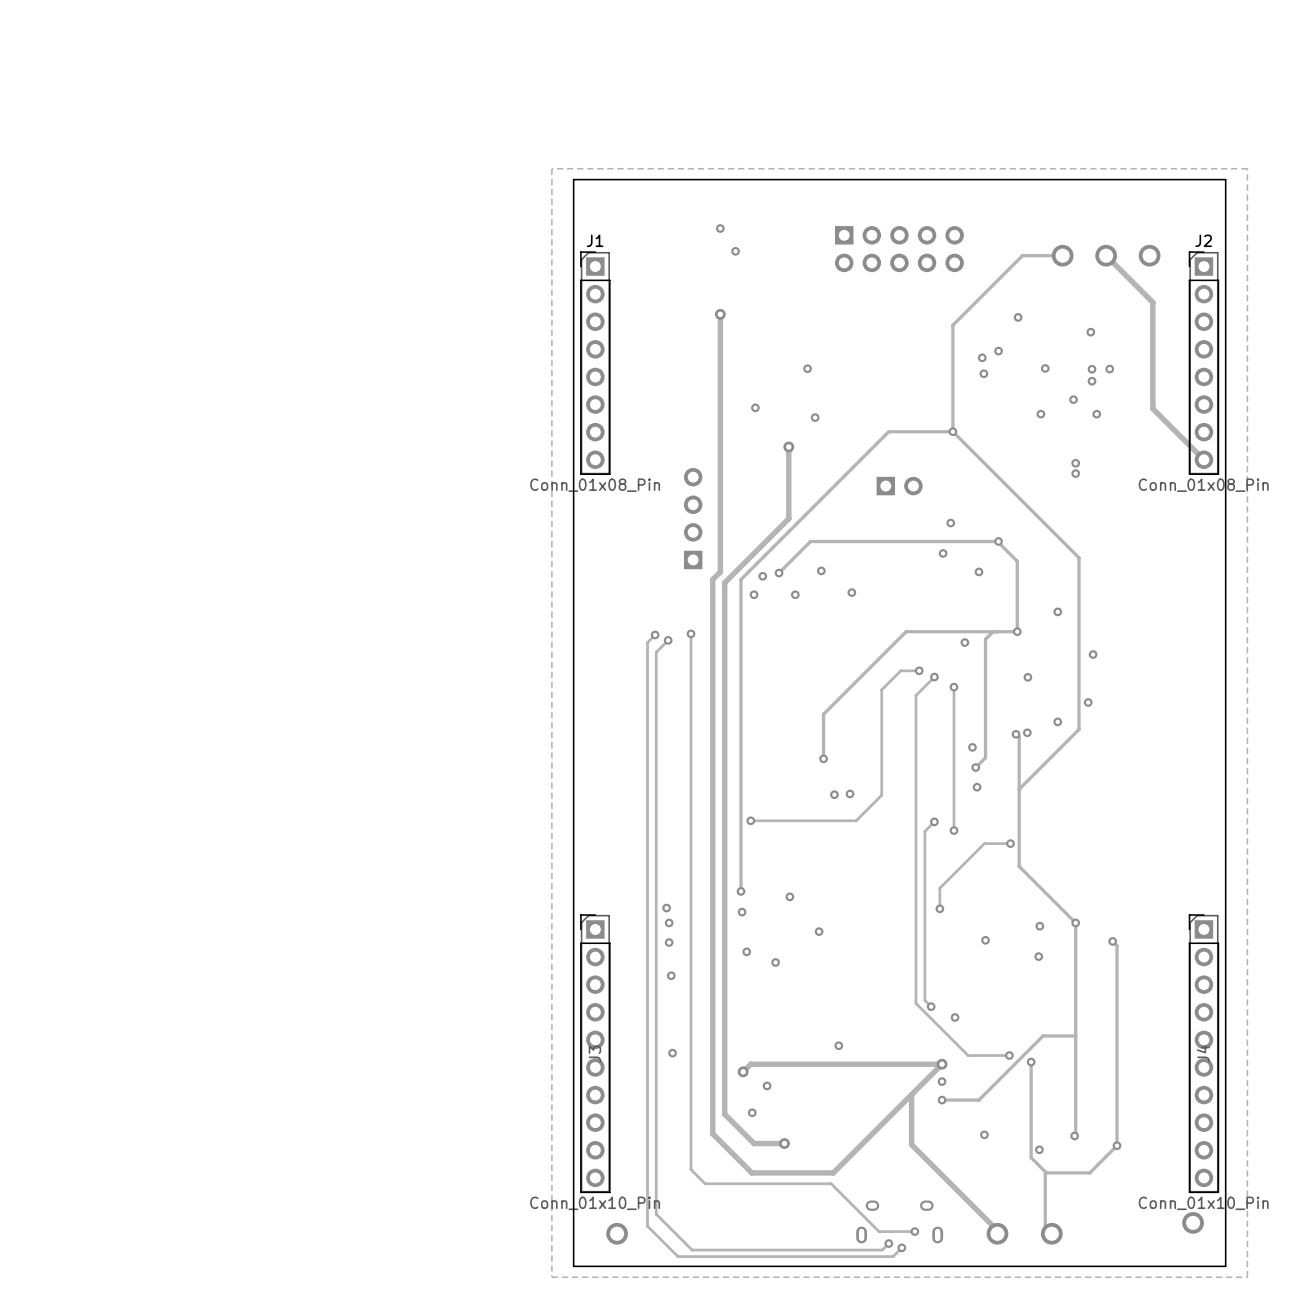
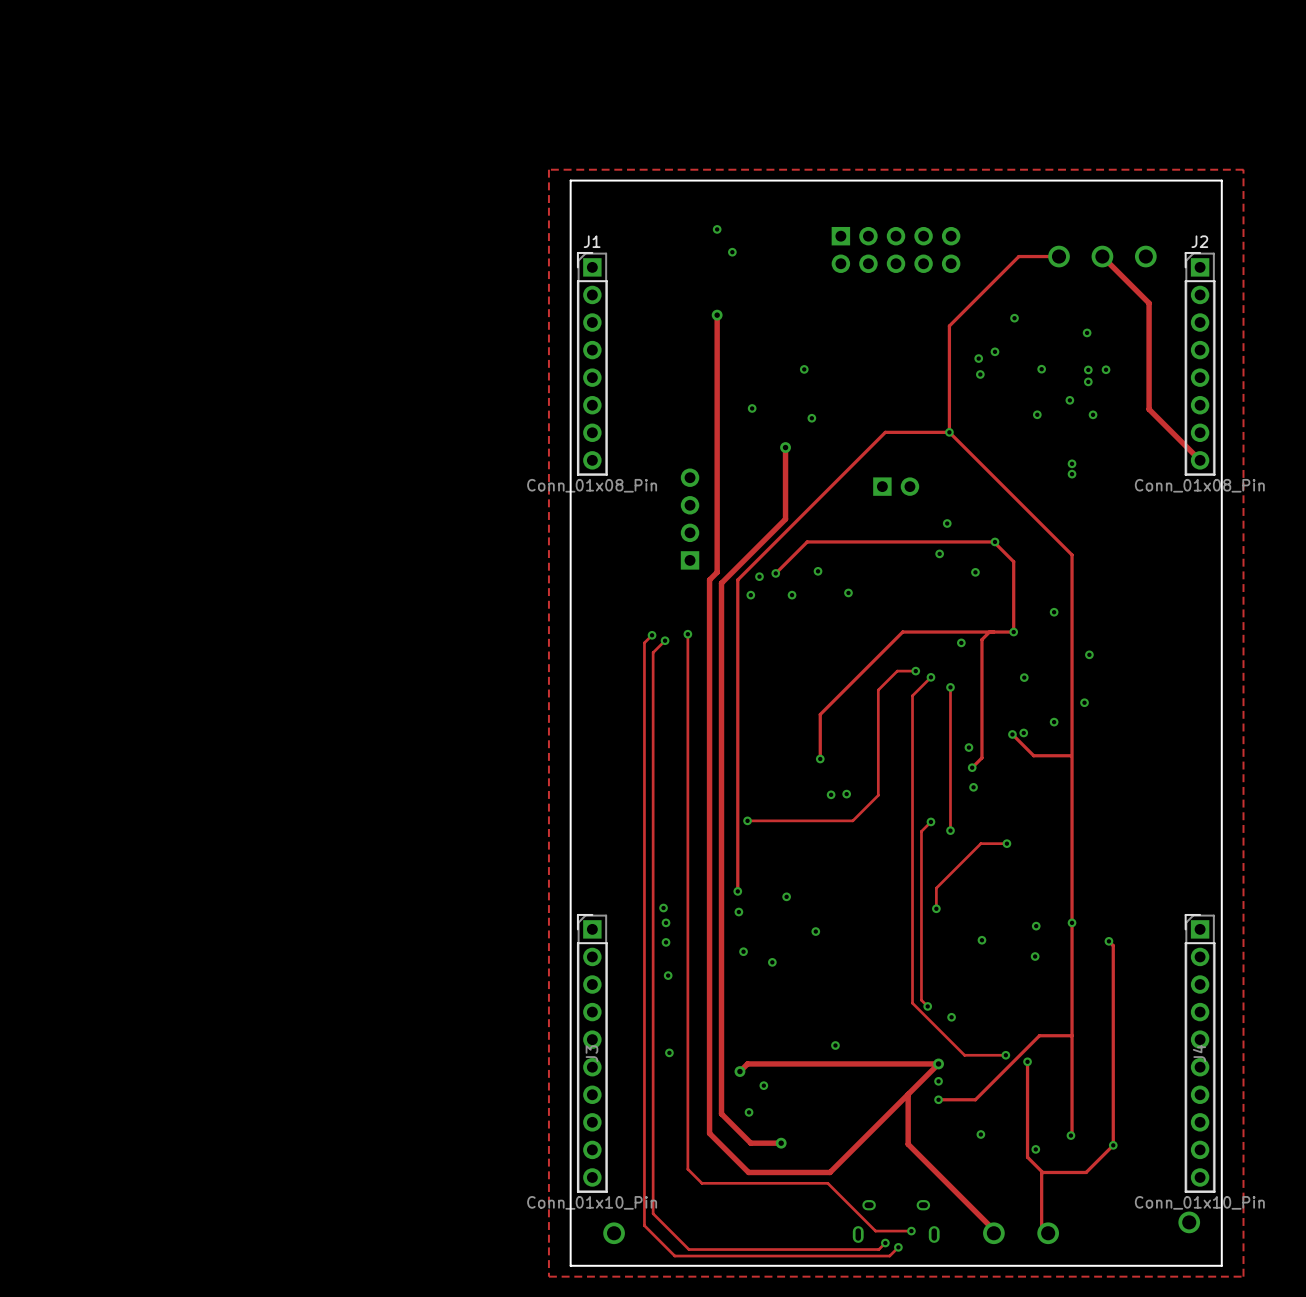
track: (1075, 554) (1078, 557) (1078, 729) (1019, 789) -> (1072, 554) (1072, 922)
track: (1019, 737) (1019, 866) (1074, 921) -> (1015, 737) (1033, 755) (1070, 755)

